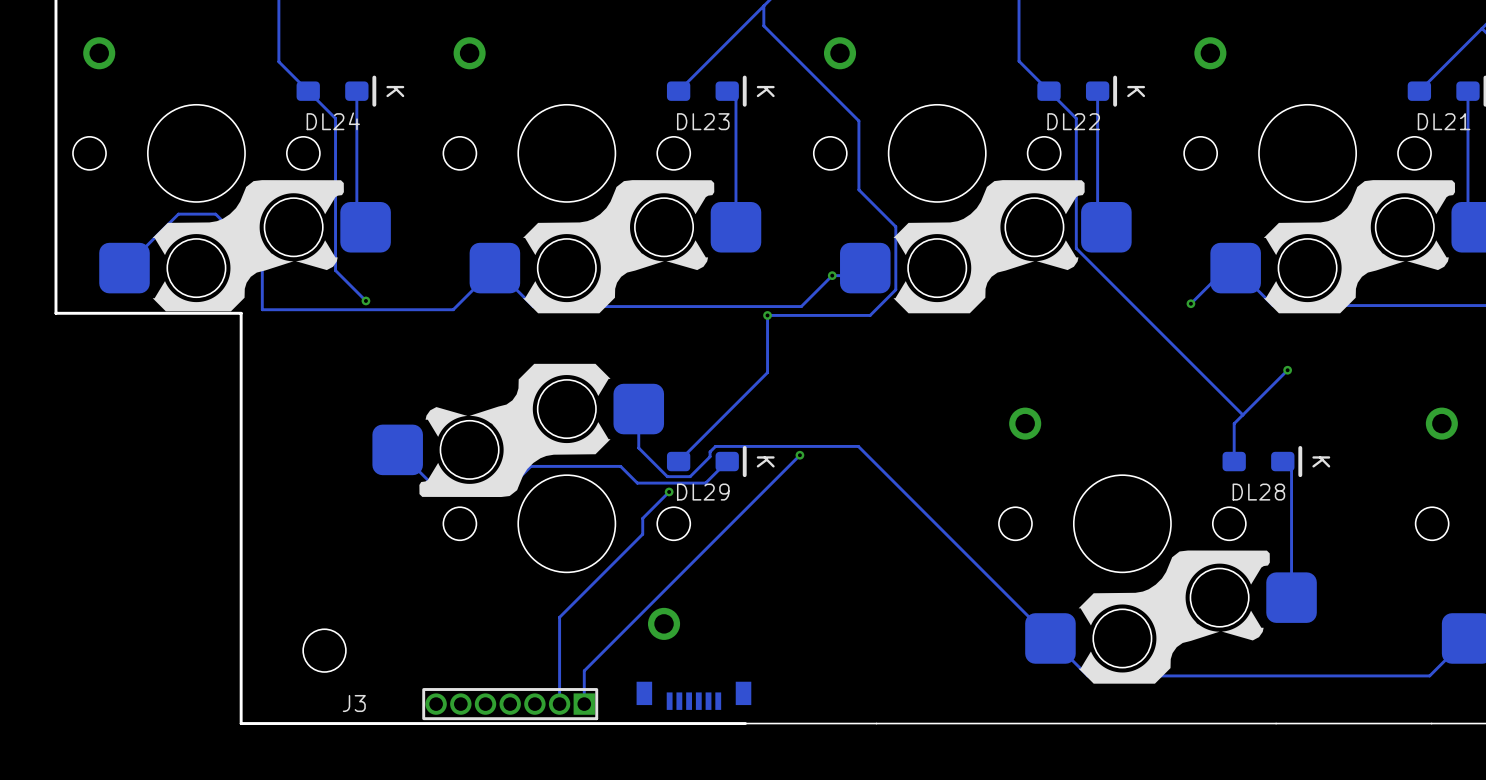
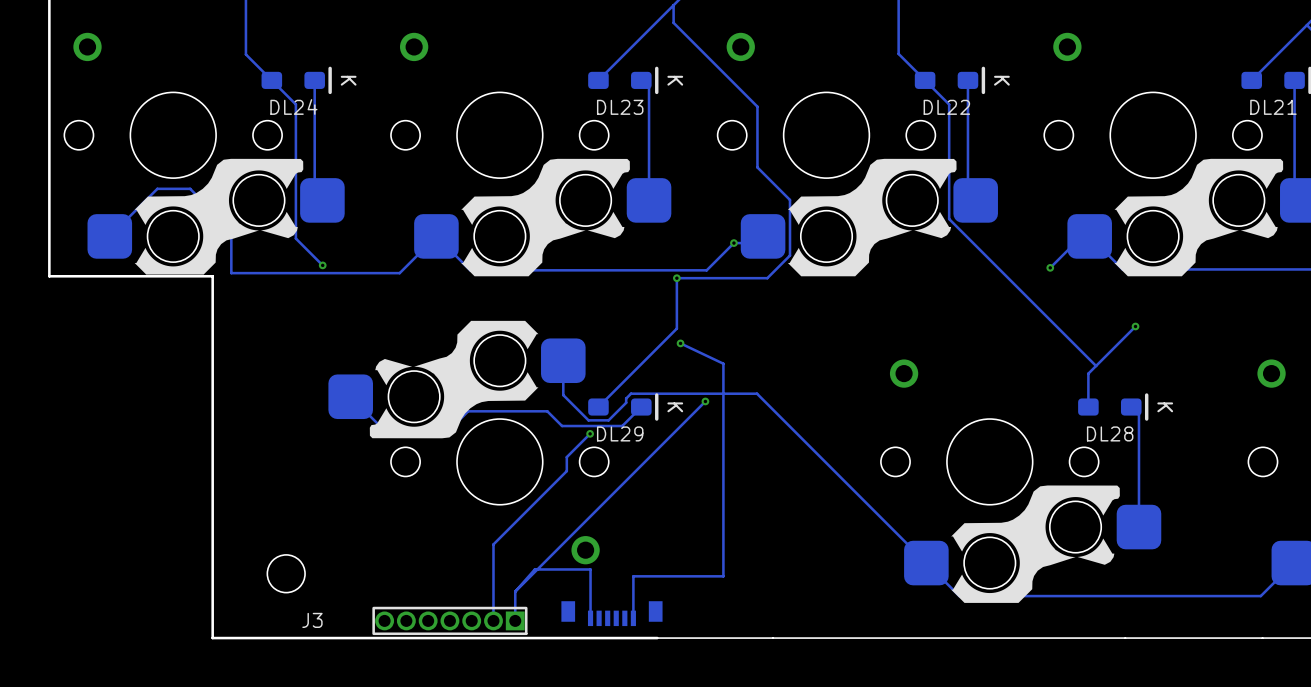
track: none -> (680, 343) (723, 363) (723, 576) (633, 576) (633, 618)
via: none -> (680, 343)
track: none -> (515, 591) (534, 569) (590, 569) (590, 618)

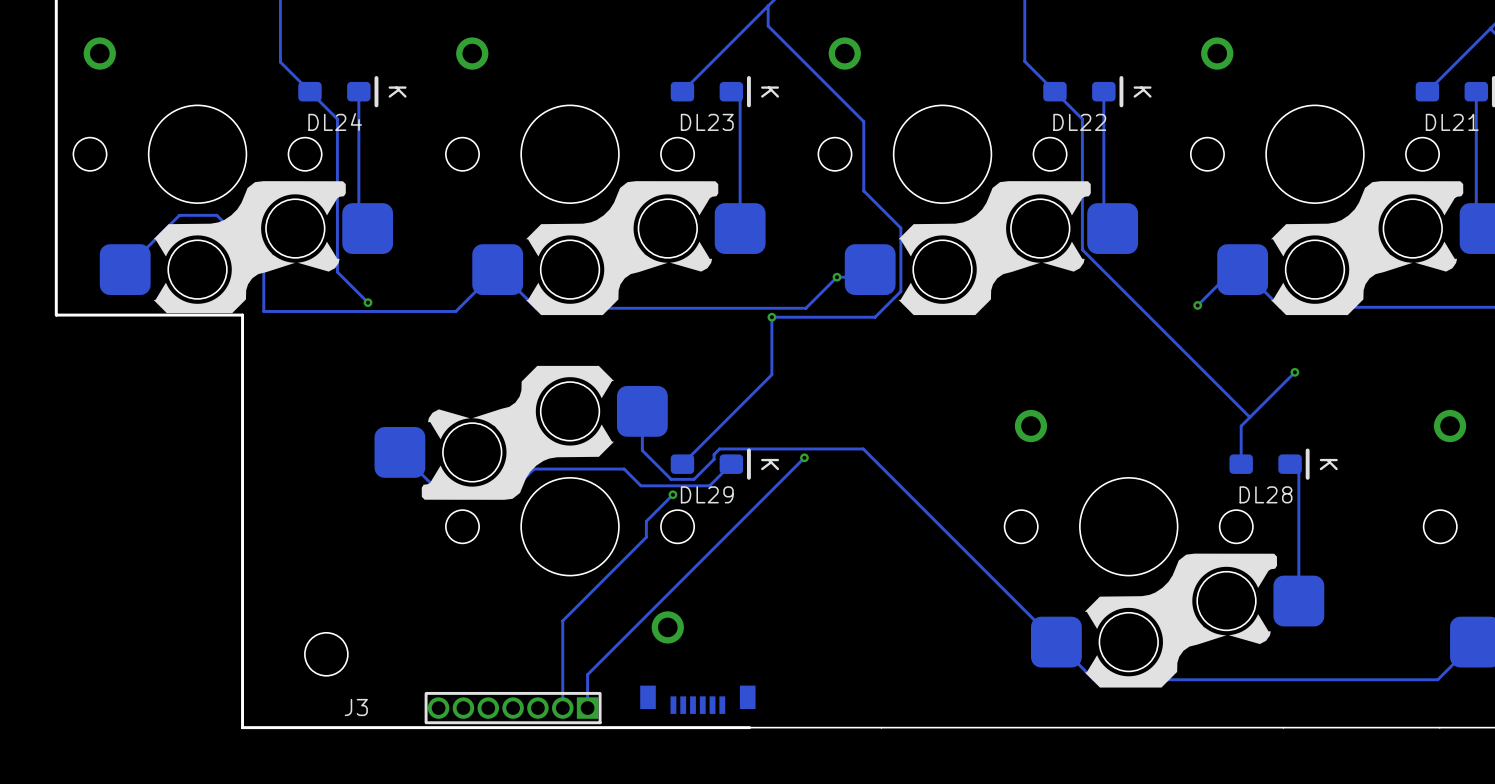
track: (680, 343) (723, 363) (723, 576) (633, 576) (633, 618) -> none
via: (680, 343) -> none
track: (515, 591) (534, 569) (590, 569) (590, 618) -> none

